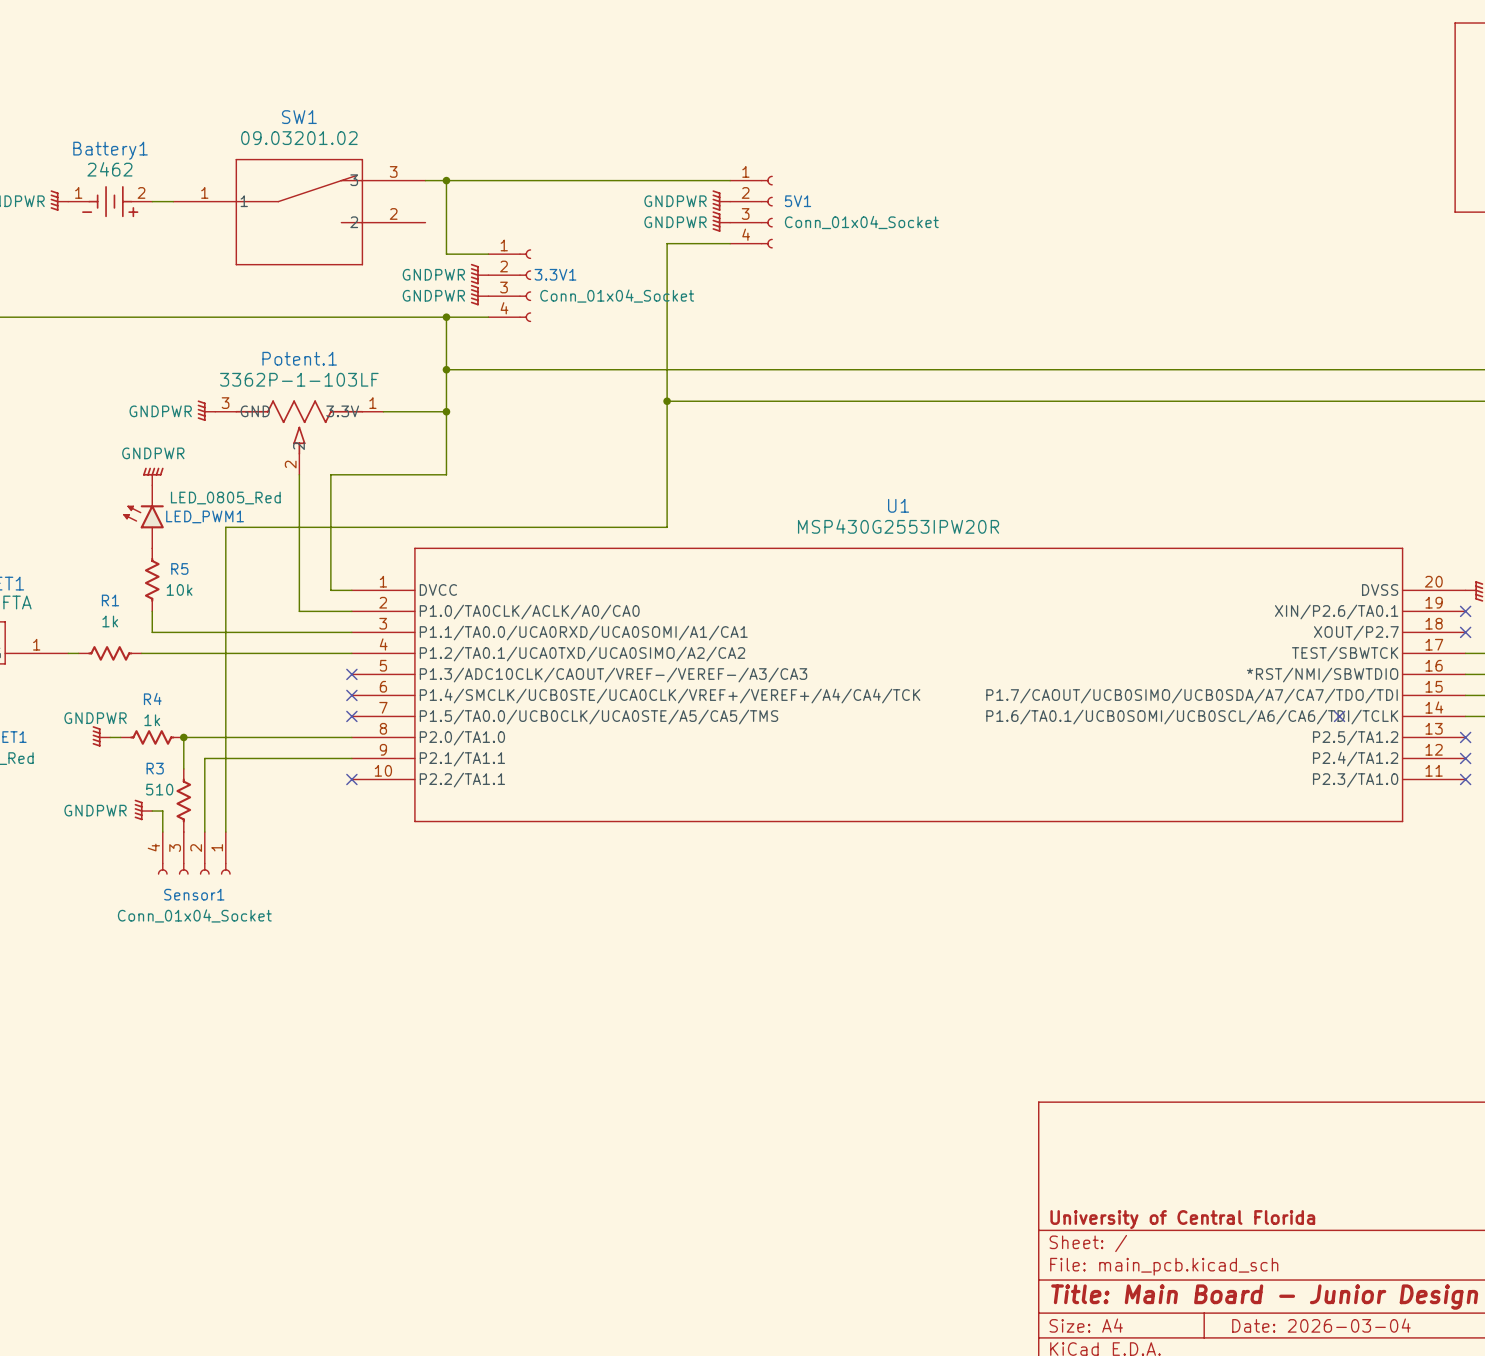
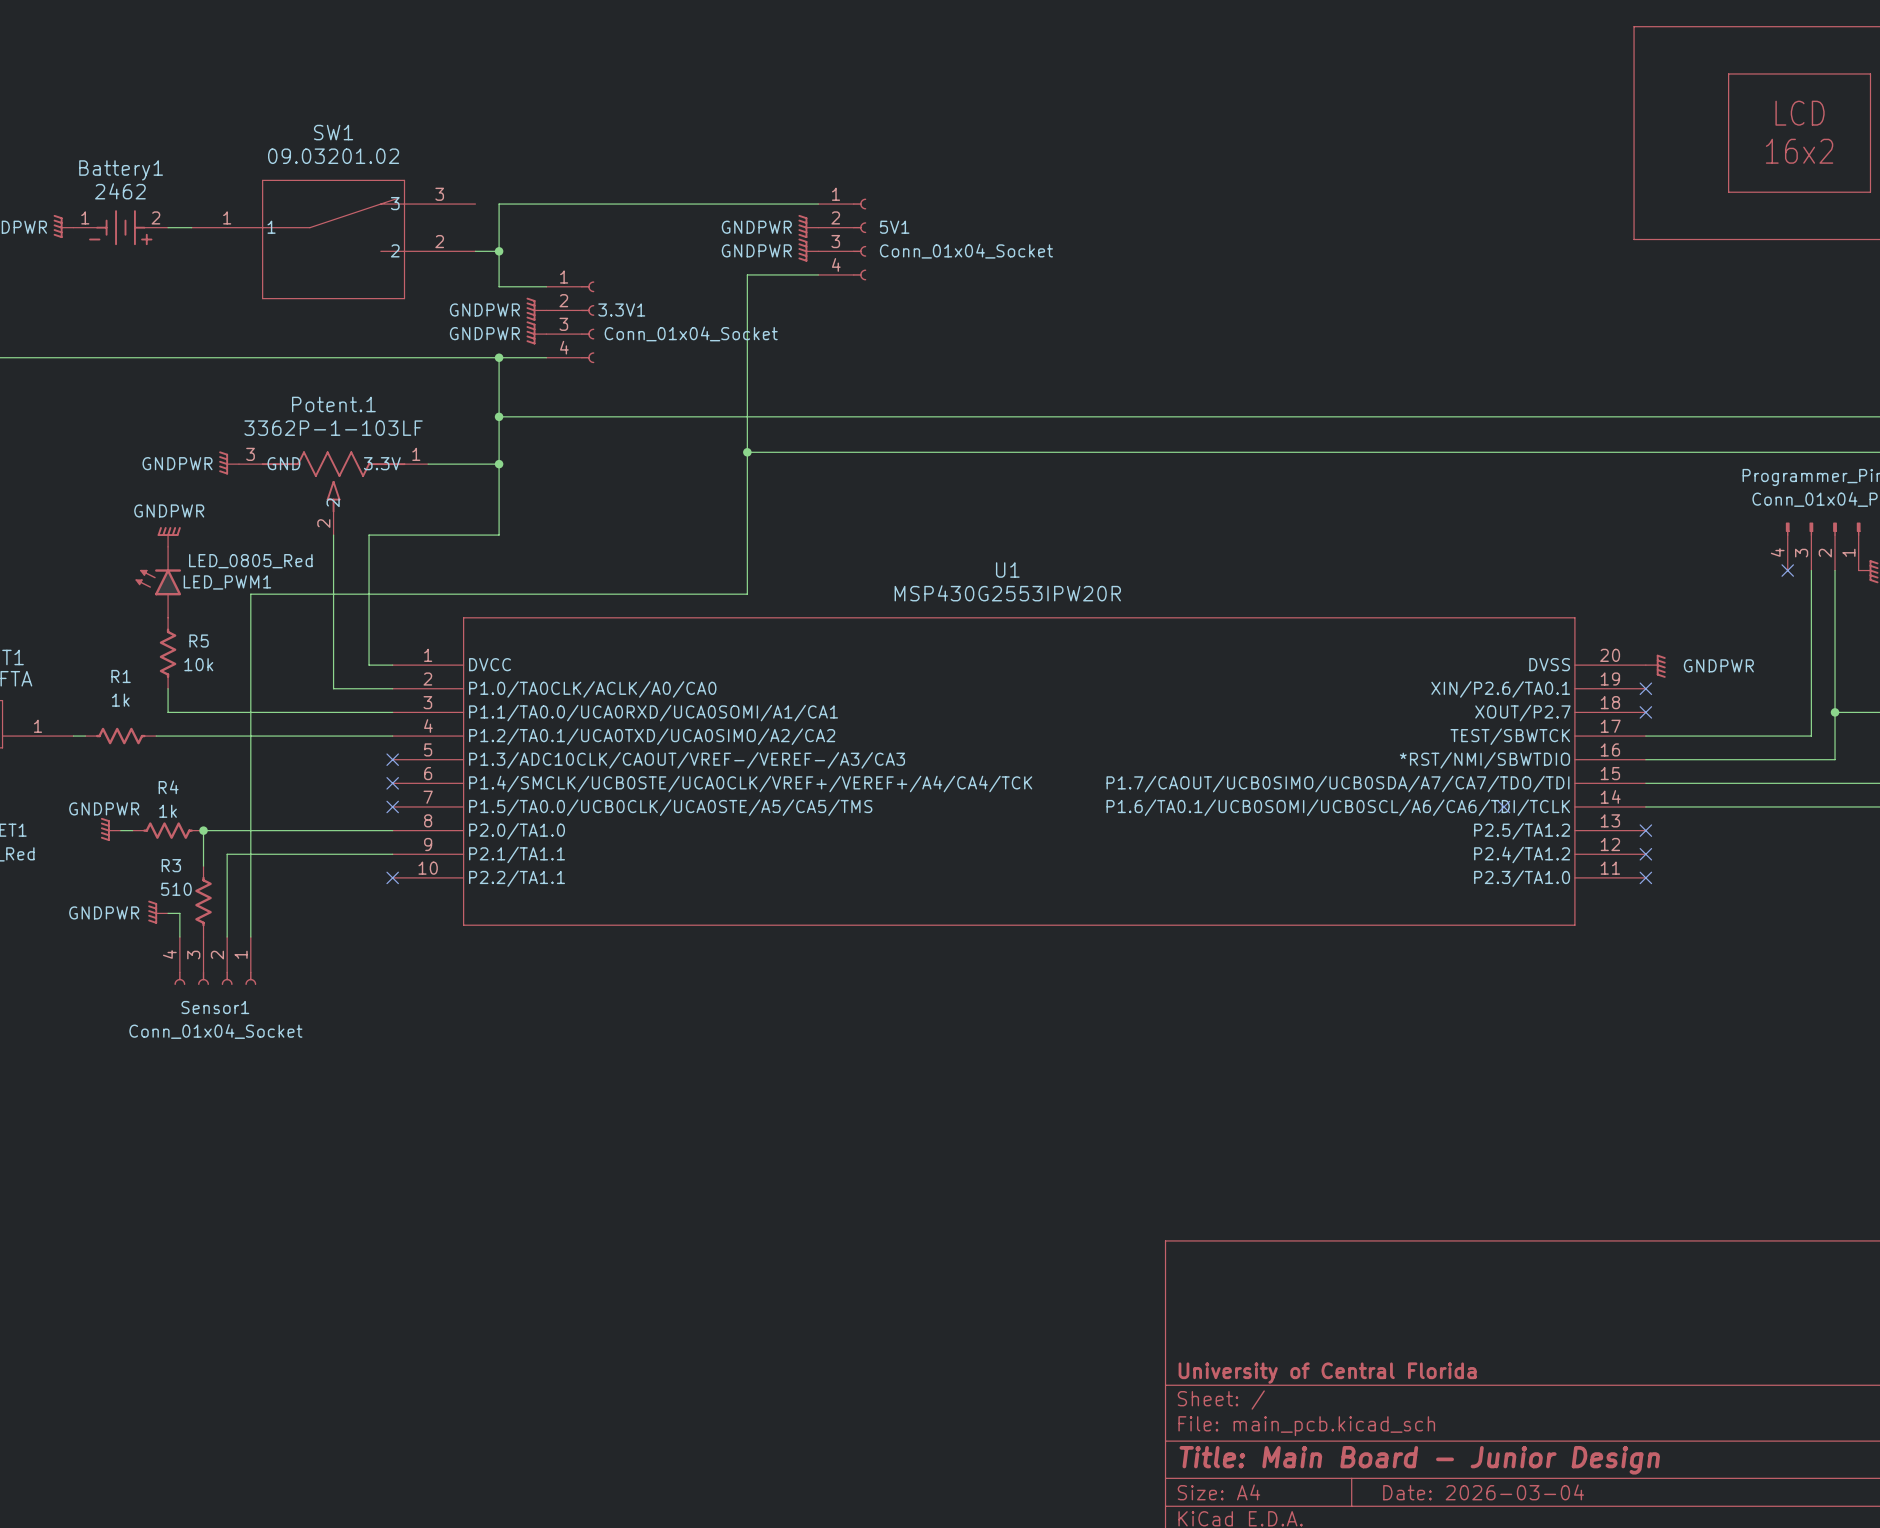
wire: (425, 180) (446, 180) -> (475, 251) (499, 251)
junction position: (446, 180) -> (499, 251)

